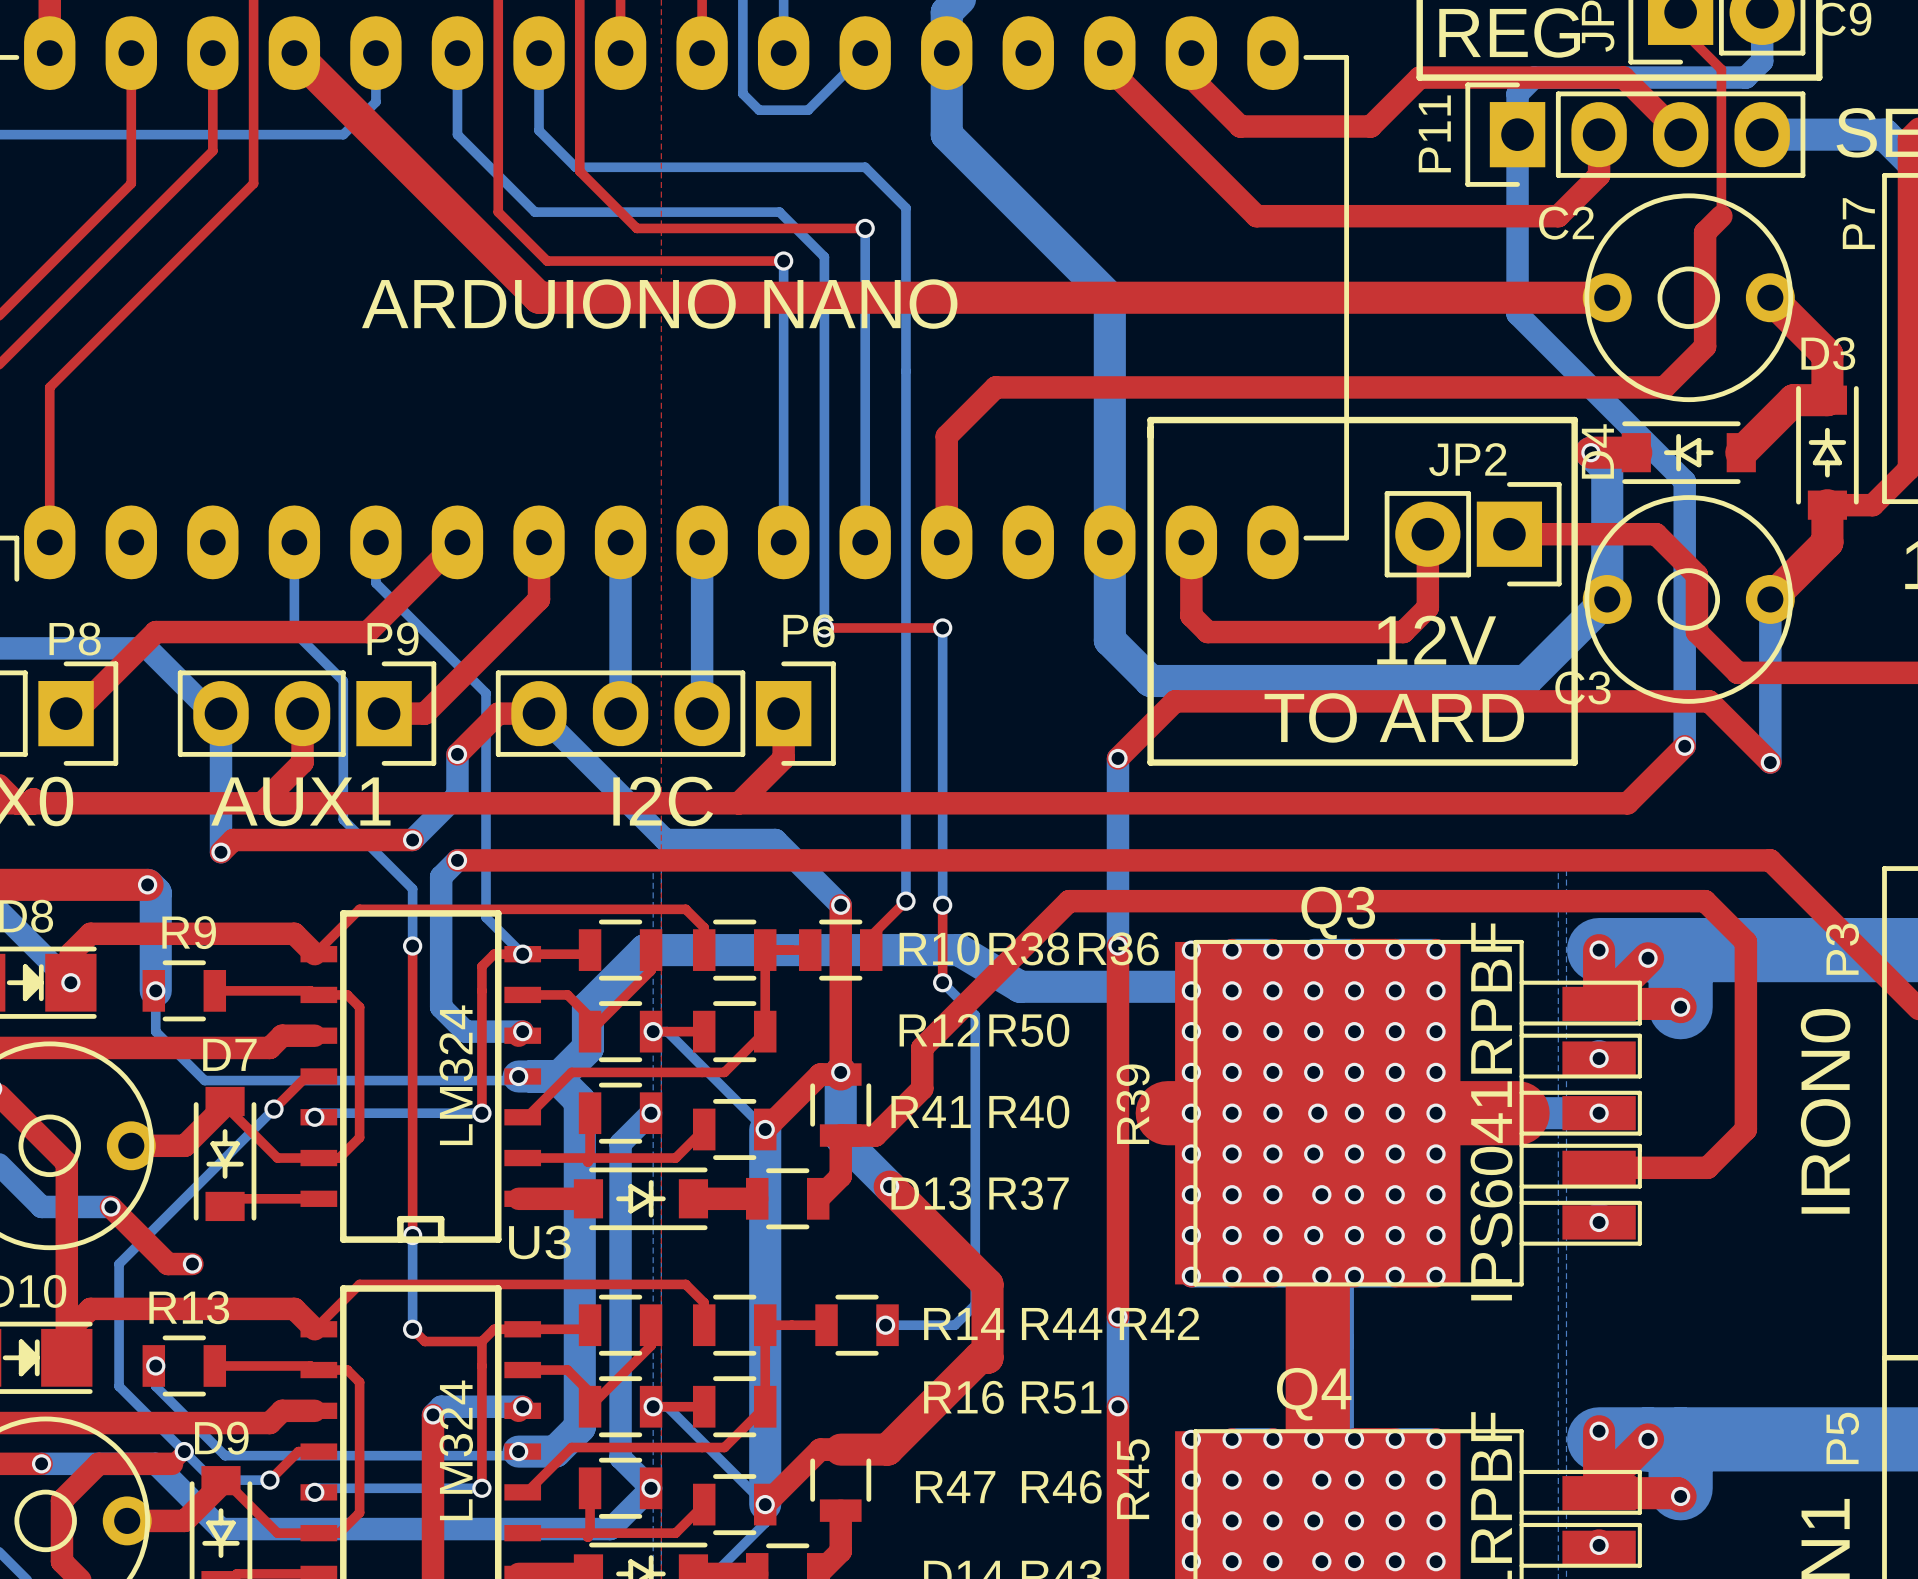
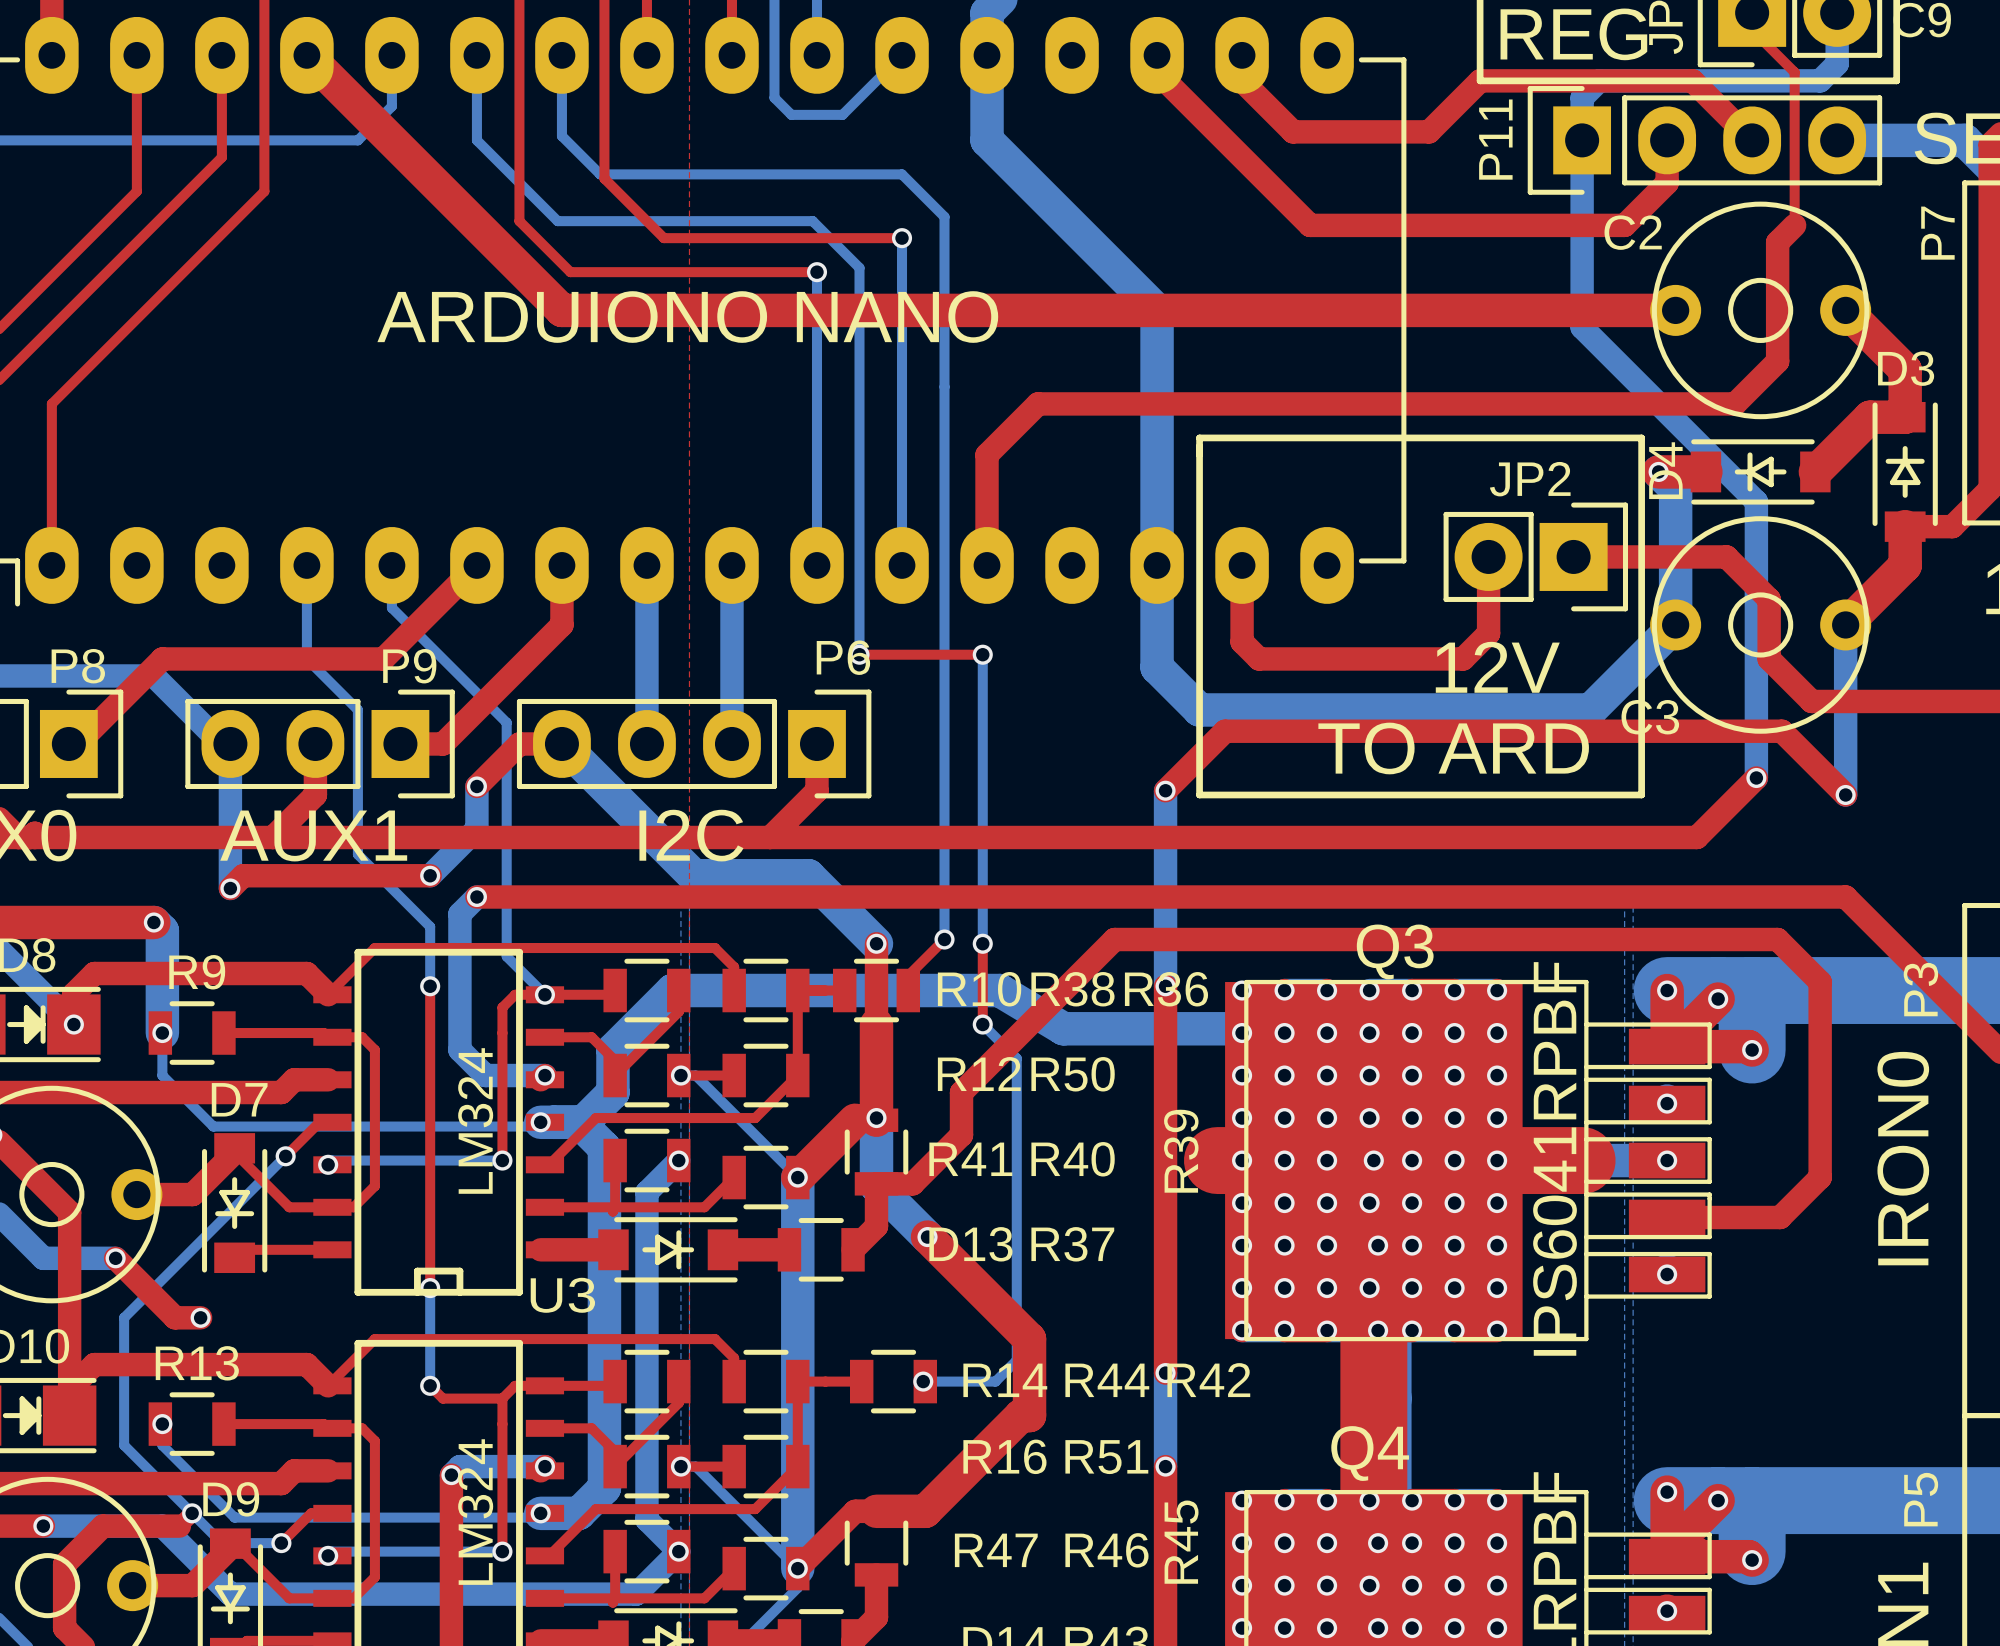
bottom track width: thin (539, 713) (665, 840) (775, 840) (840, 905) -> thick (561, 743) (693, 875) (808, 875) (876, 943)
top track width: thin (840, 982) (840, 1072) -> thick (876, 1024) (876, 1118)
top track width: thin (820, 1074) (765, 1129) -> thick (855, 1120) (797, 1177)

